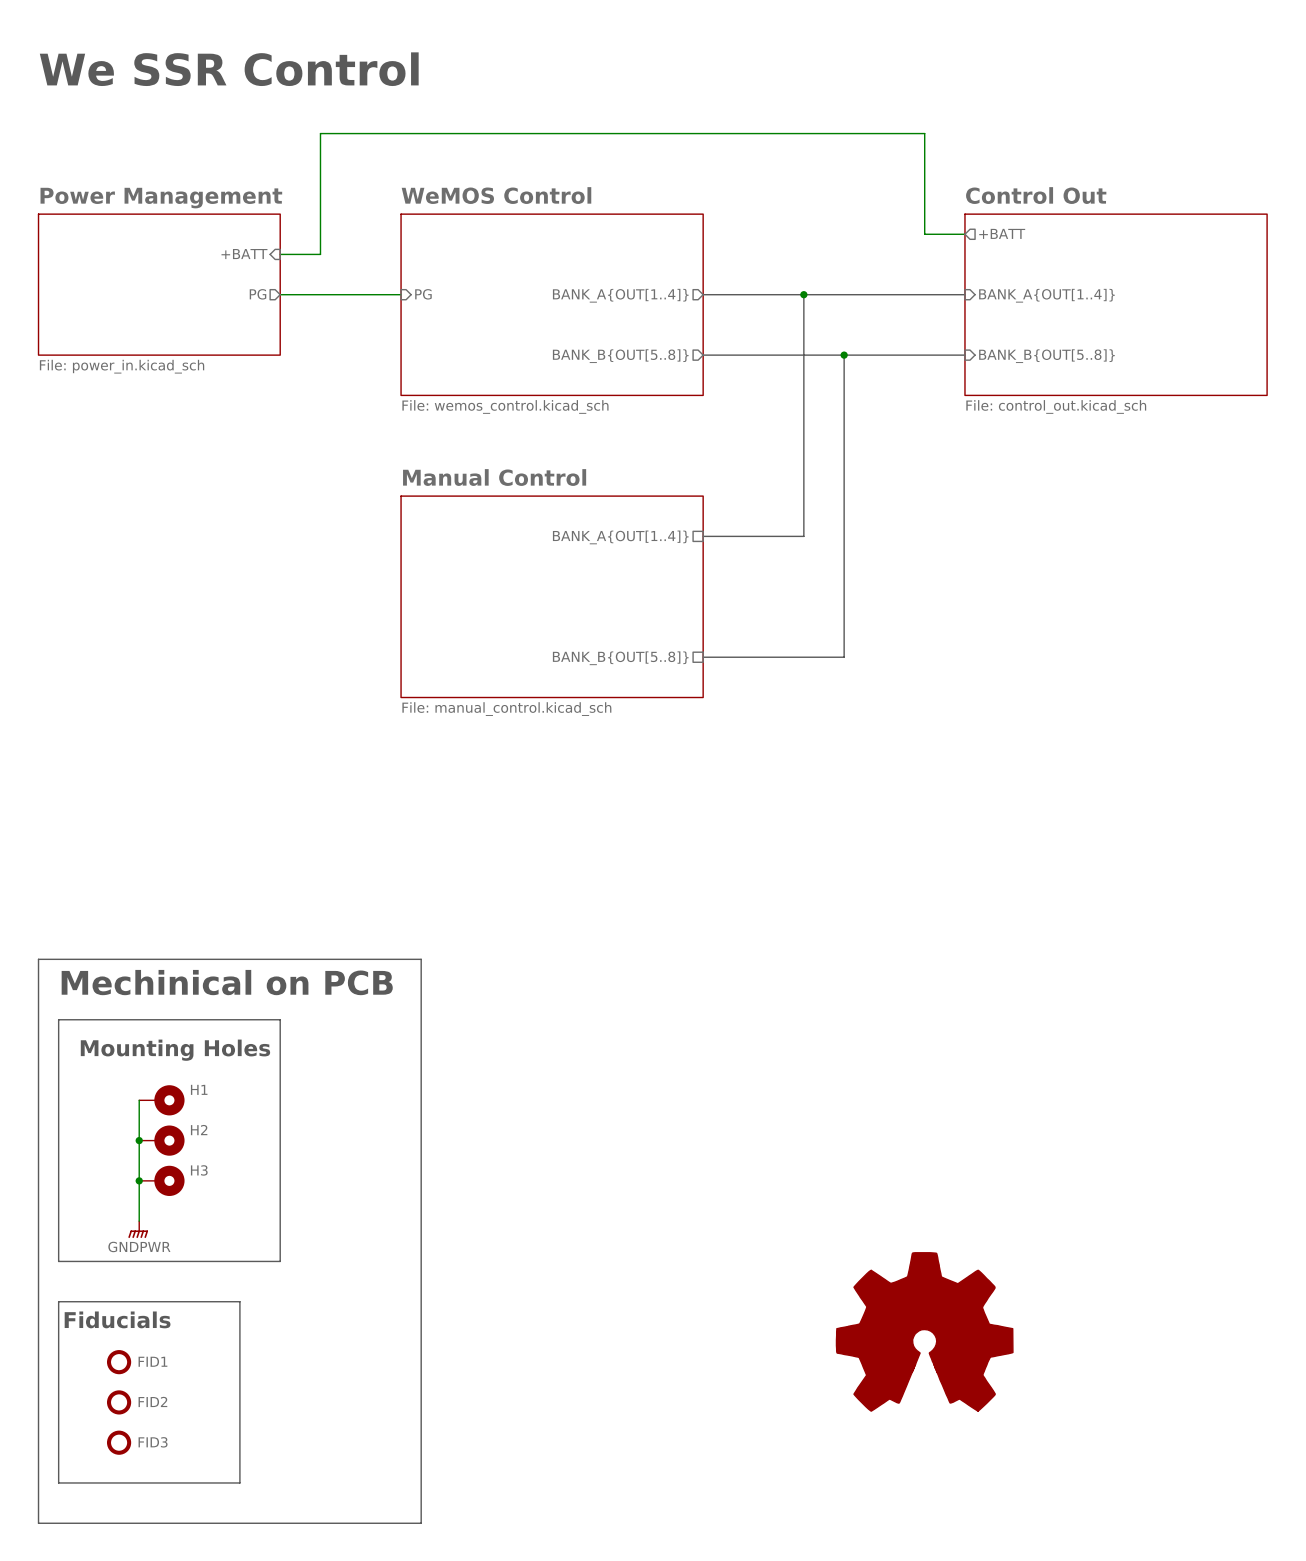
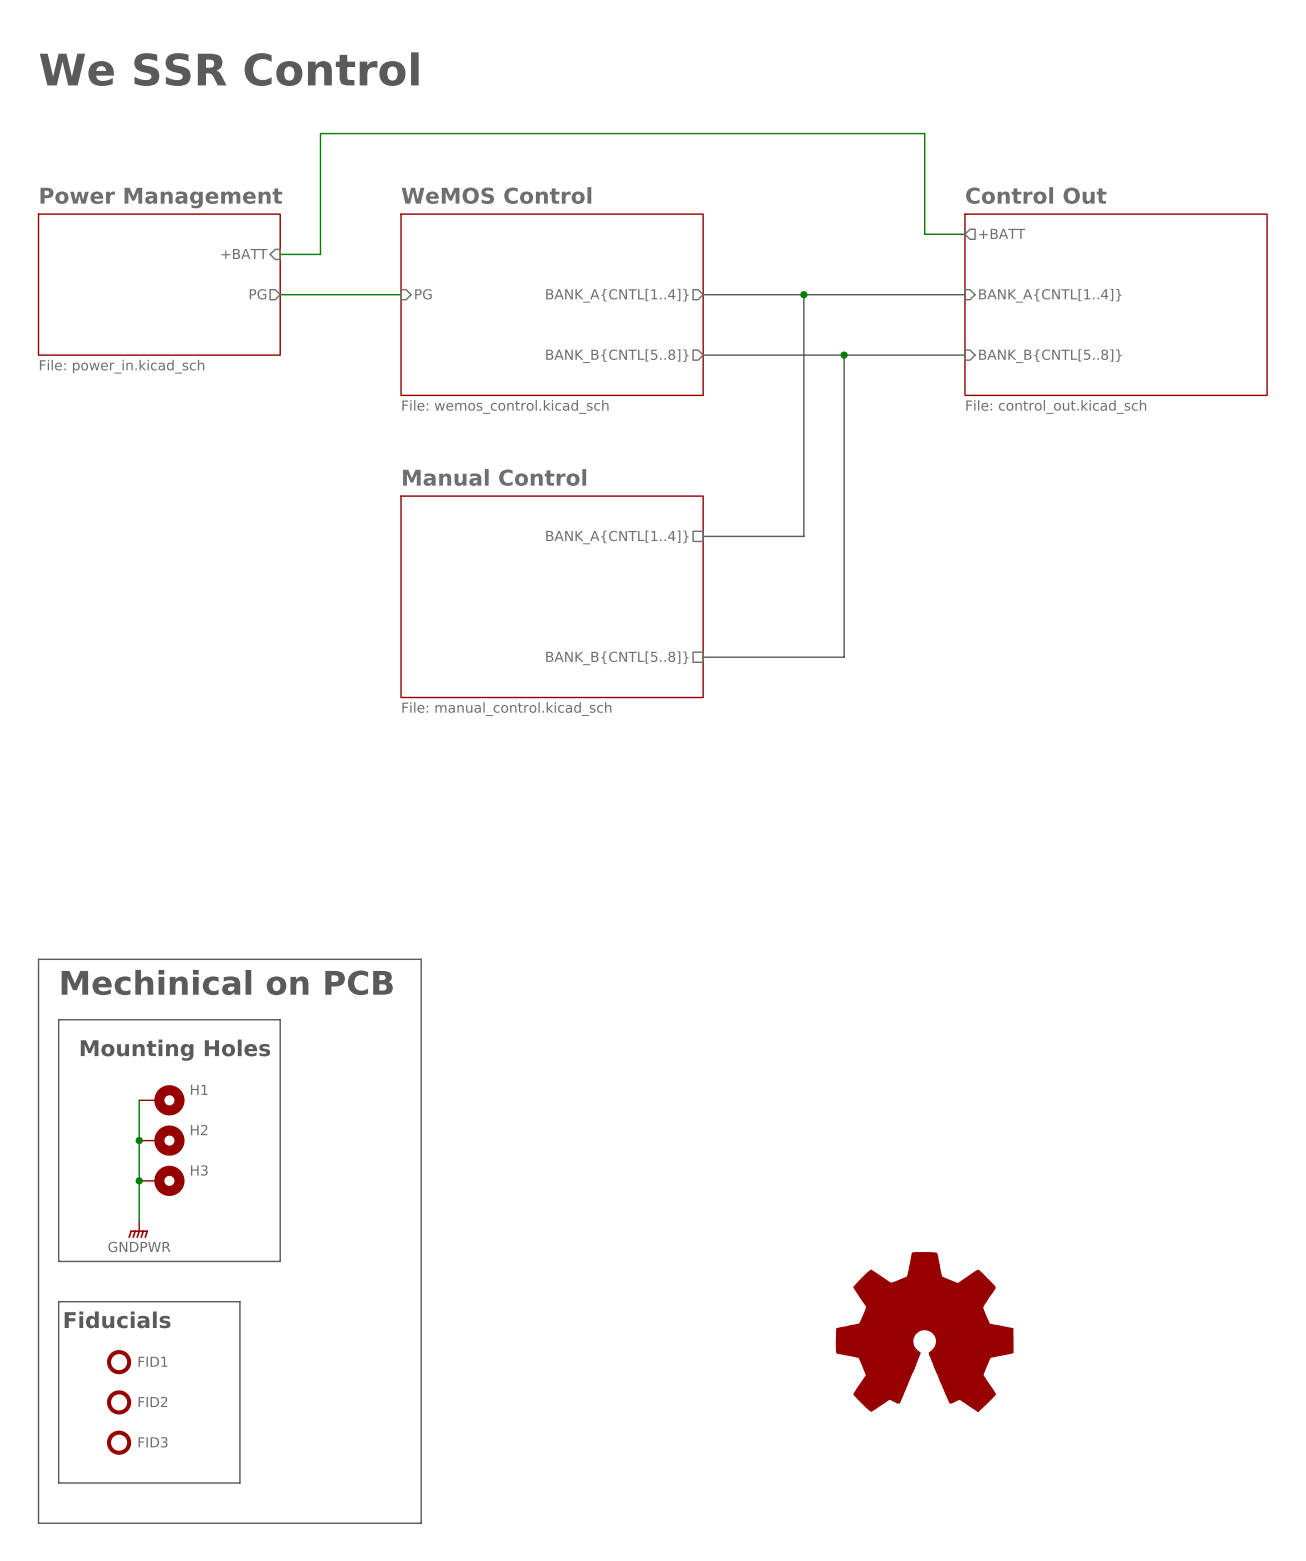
sheet pin: BANK_A{OUT[1..4]} (620, 295) -> BANK_A{CNTL[1..4]} (617, 295)
sheet pin: BANK_A{OUT[1..4]} (1046, 295) -> BANK_A{CNTL[1..4]} (1050, 295)
sheet pin: BANK_B{OUT[5..8]} (620, 356) -> BANK_B{CNTL[5..8]} (617, 356)
sheet pin: BANK_B{OUT[5..8]} (1046, 356) -> BANK_B{CNTL[5..8]} (1050, 356)
sheet pin: BANK_A{OUT[1..4]} (620, 537) -> BANK_A{CNTL[1..4]} (617, 537)
sheet pin: BANK_B{OUT[5..8]} (620, 658) -> BANK_B{CNTL[5..8]} (617, 658)

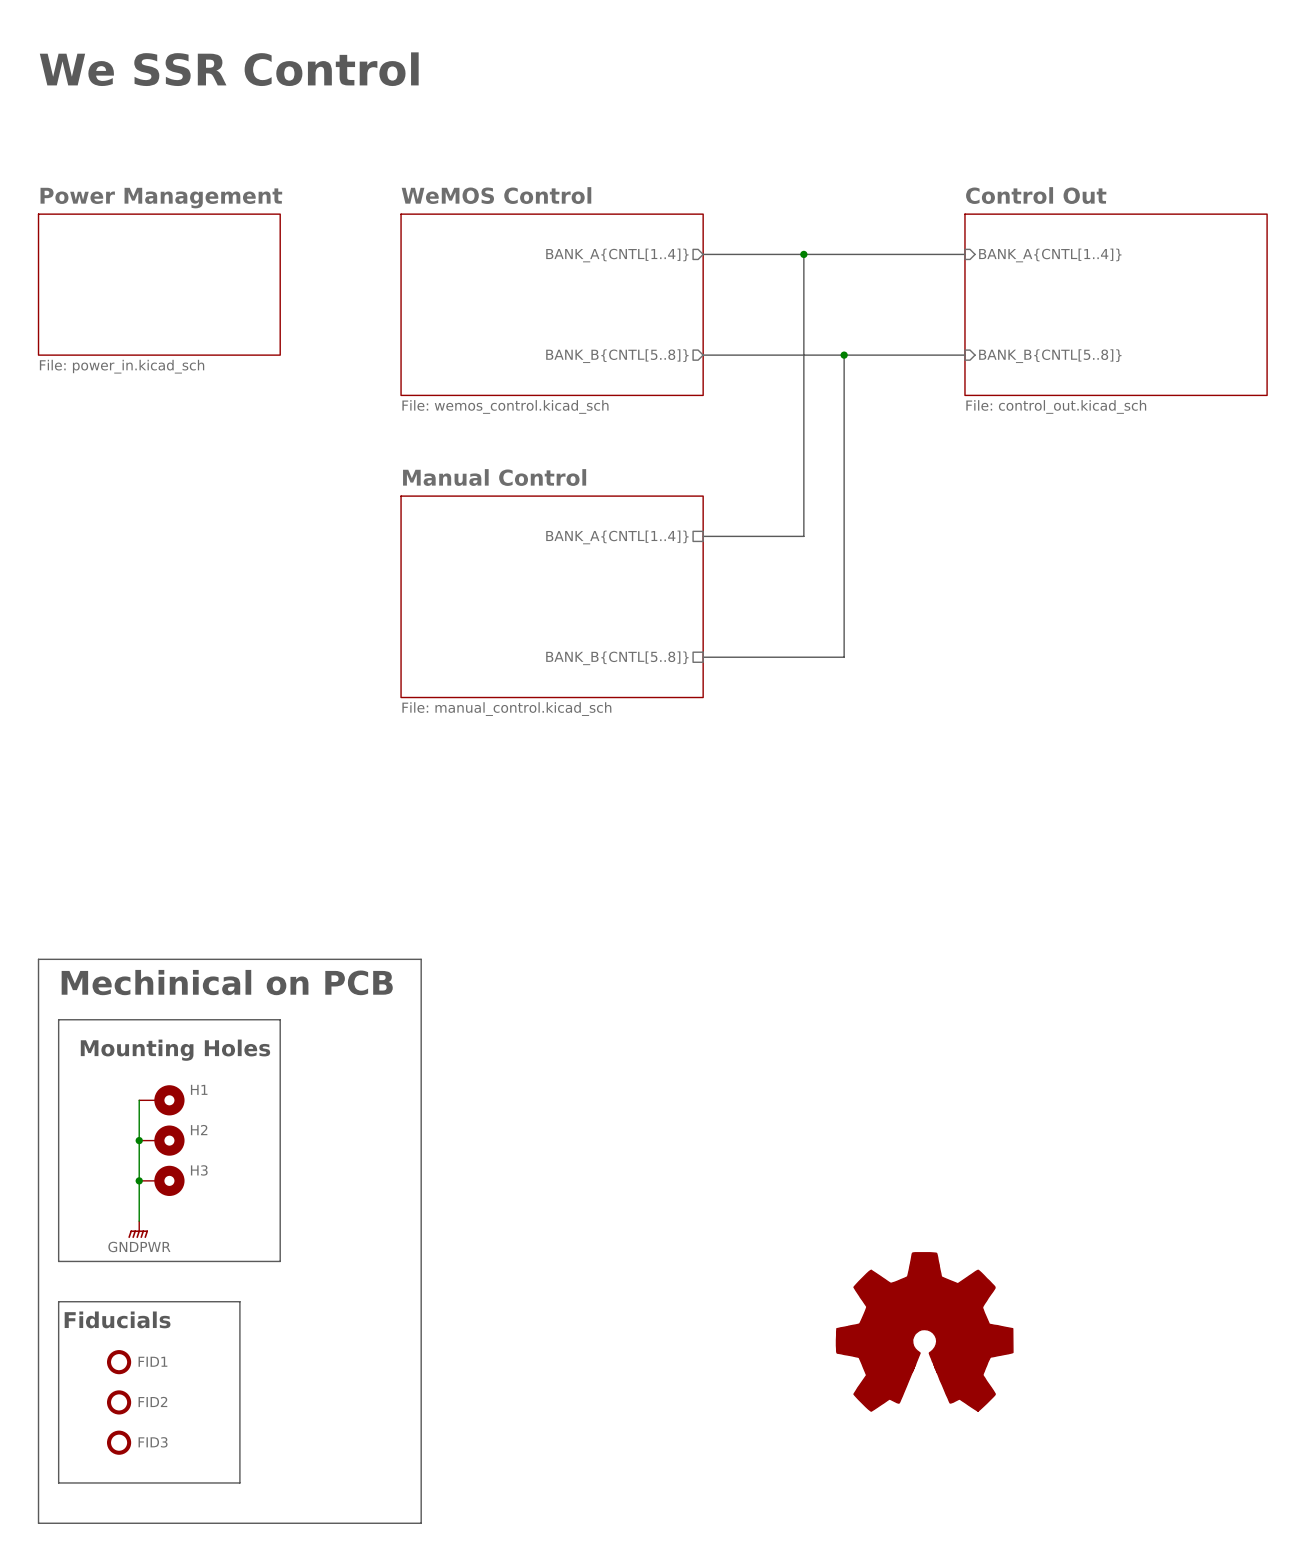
sheet pin: +BATT (1002, 233) -> none
wire: (964, 234) (924, 234) (924, 133) (320, 133) (320, 254) (280, 254) -> none
sheet pin: +BATT (244, 254) -> none
bus: none -> (803, 254) (803, 294)
sheet pin: PG (258, 294) -> none
wire: (280, 294) (401, 294) -> none
sheet pin: PG (423, 294) -> none
bus: (703, 294) (964, 294) -> (703, 254) (964, 254)
junction position: (803, 294) -> (803, 254)
sheet pin position: BANK_A{CNTL[1..4]} (617, 295) -> BANK_A{CNTL[1..4]} (617, 255)
sheet pin position: BANK_A{CNTL[1..4]} (1050, 295) -> BANK_A{CNTL[1..4]} (1050, 255)

